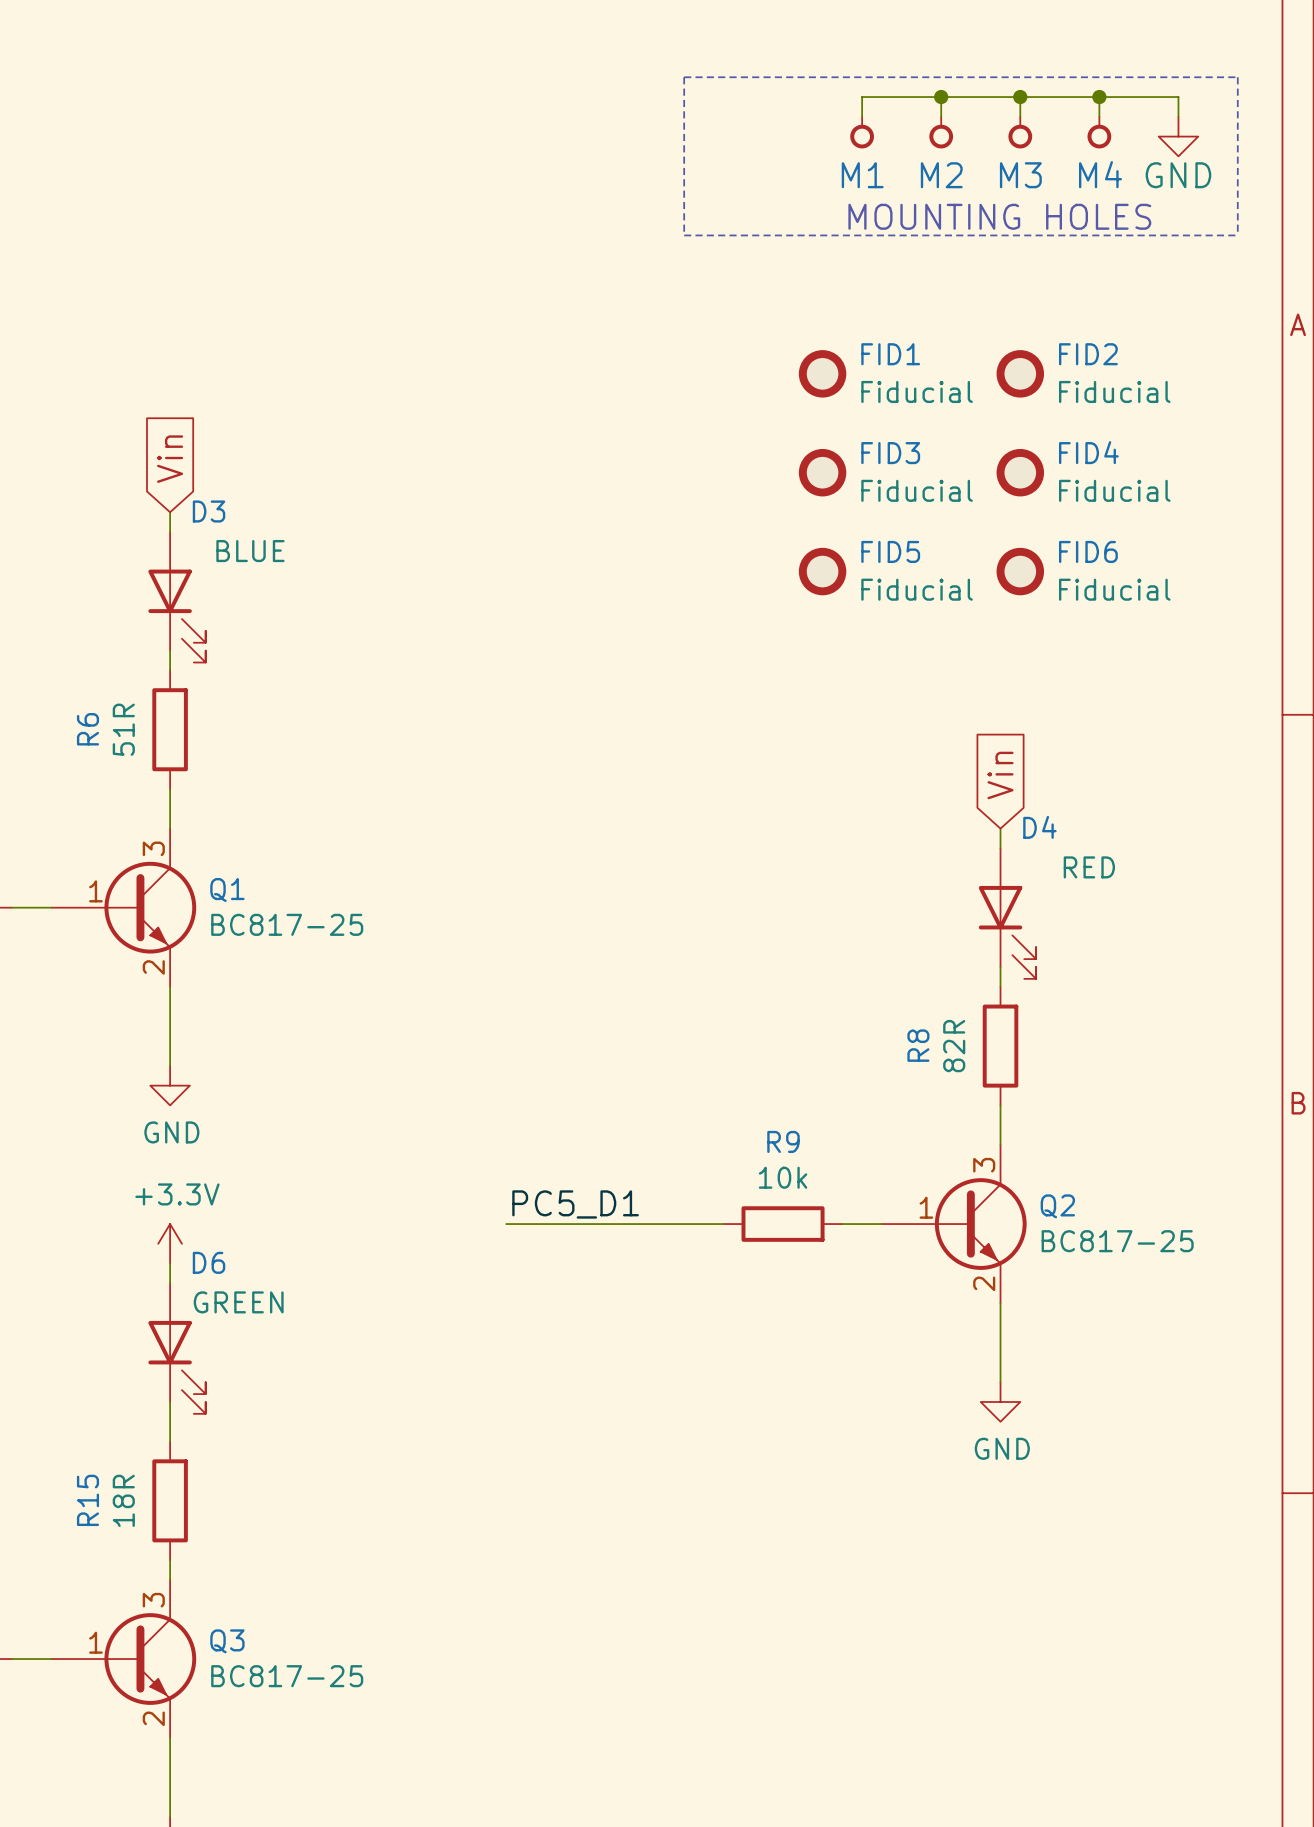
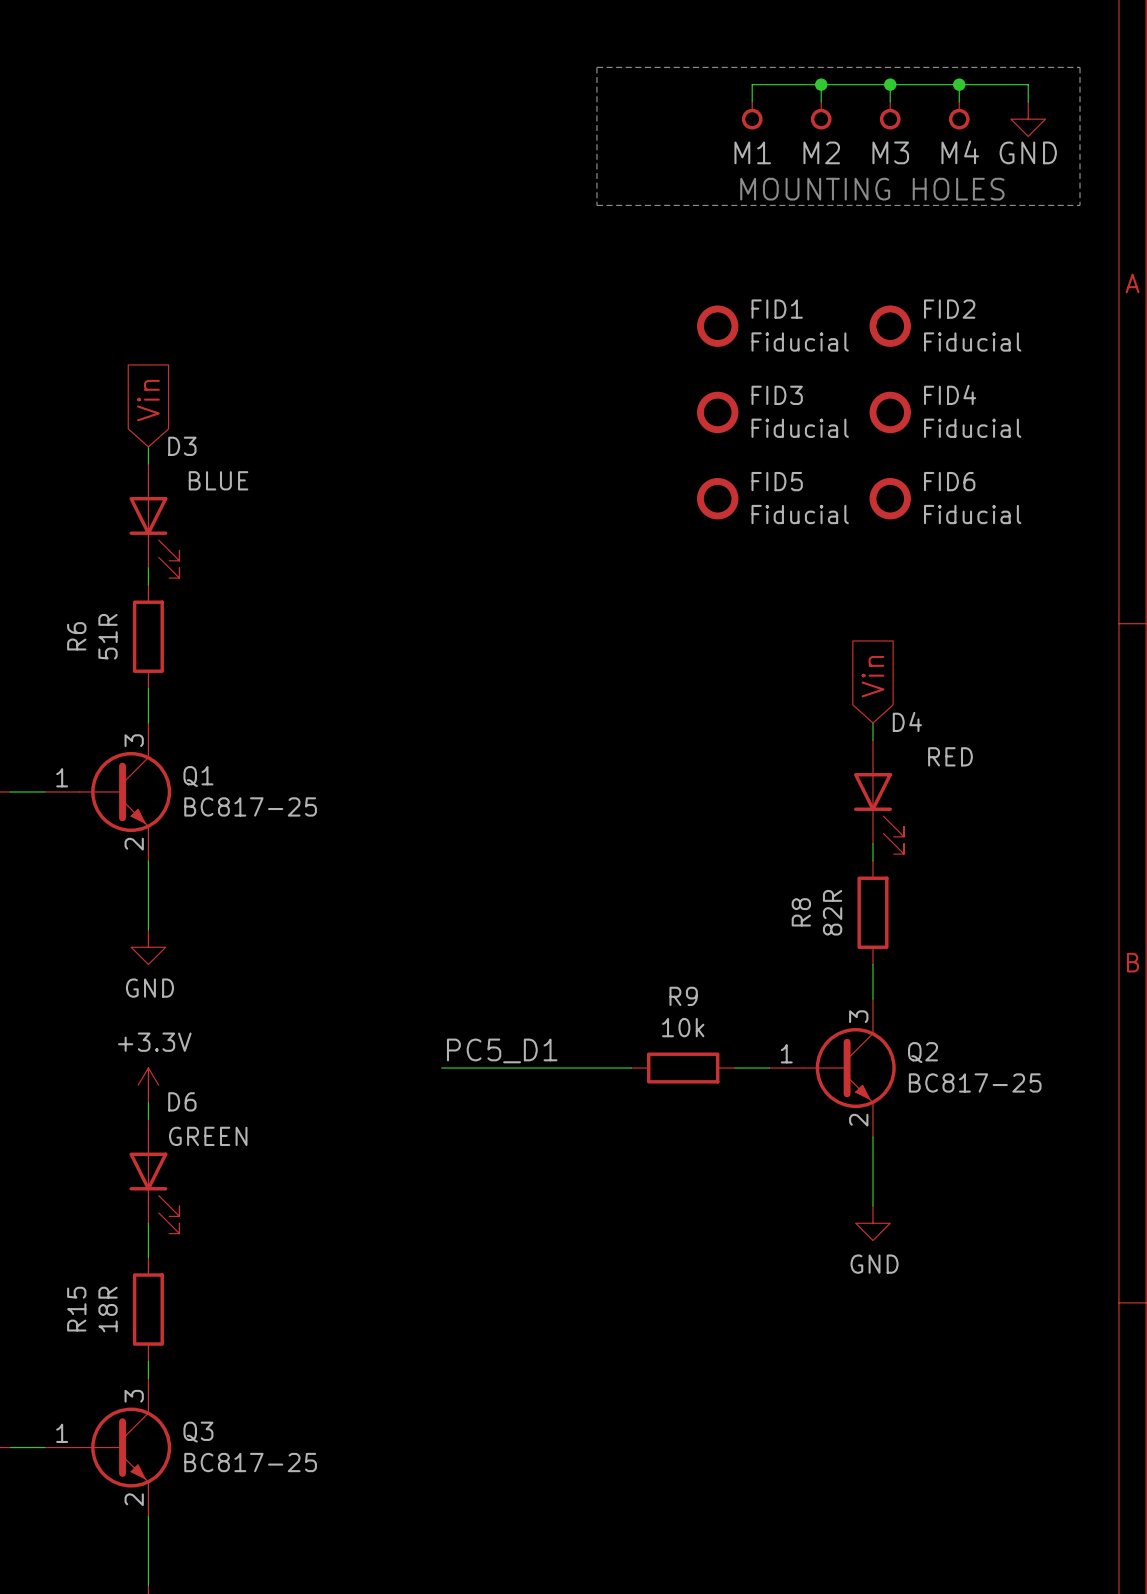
Q1 symbol: [51, 828, 197, 987] -> [44, 722, 172, 861]
Q2 symbol: [881, 1144, 1027, 1304] -> [769, 999, 896, 1138]
Q3 symbol: [51, 1579, 197, 1739] -> [44, 1378, 172, 1517]

